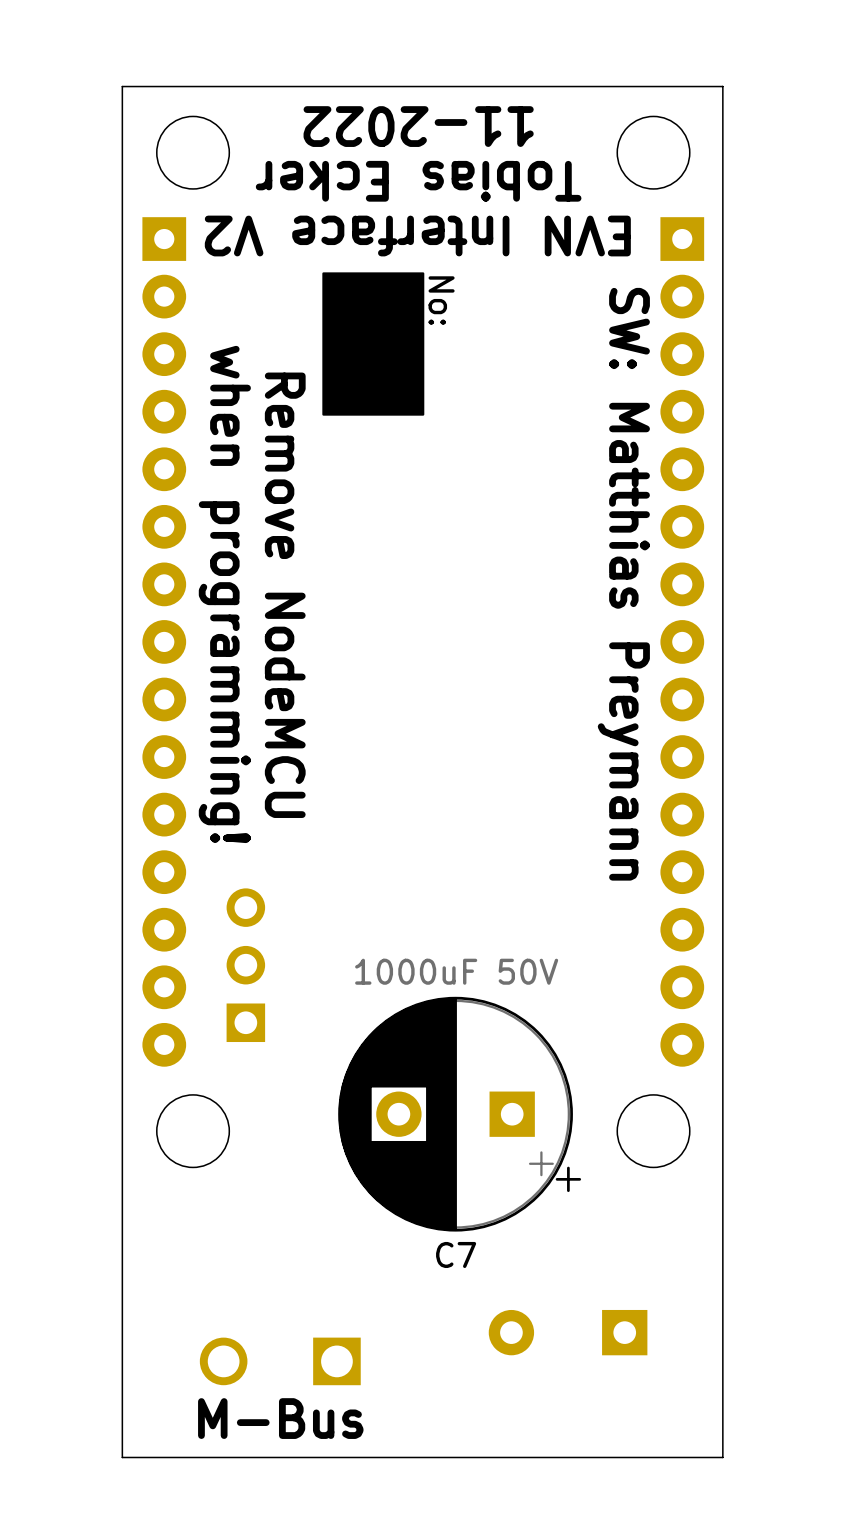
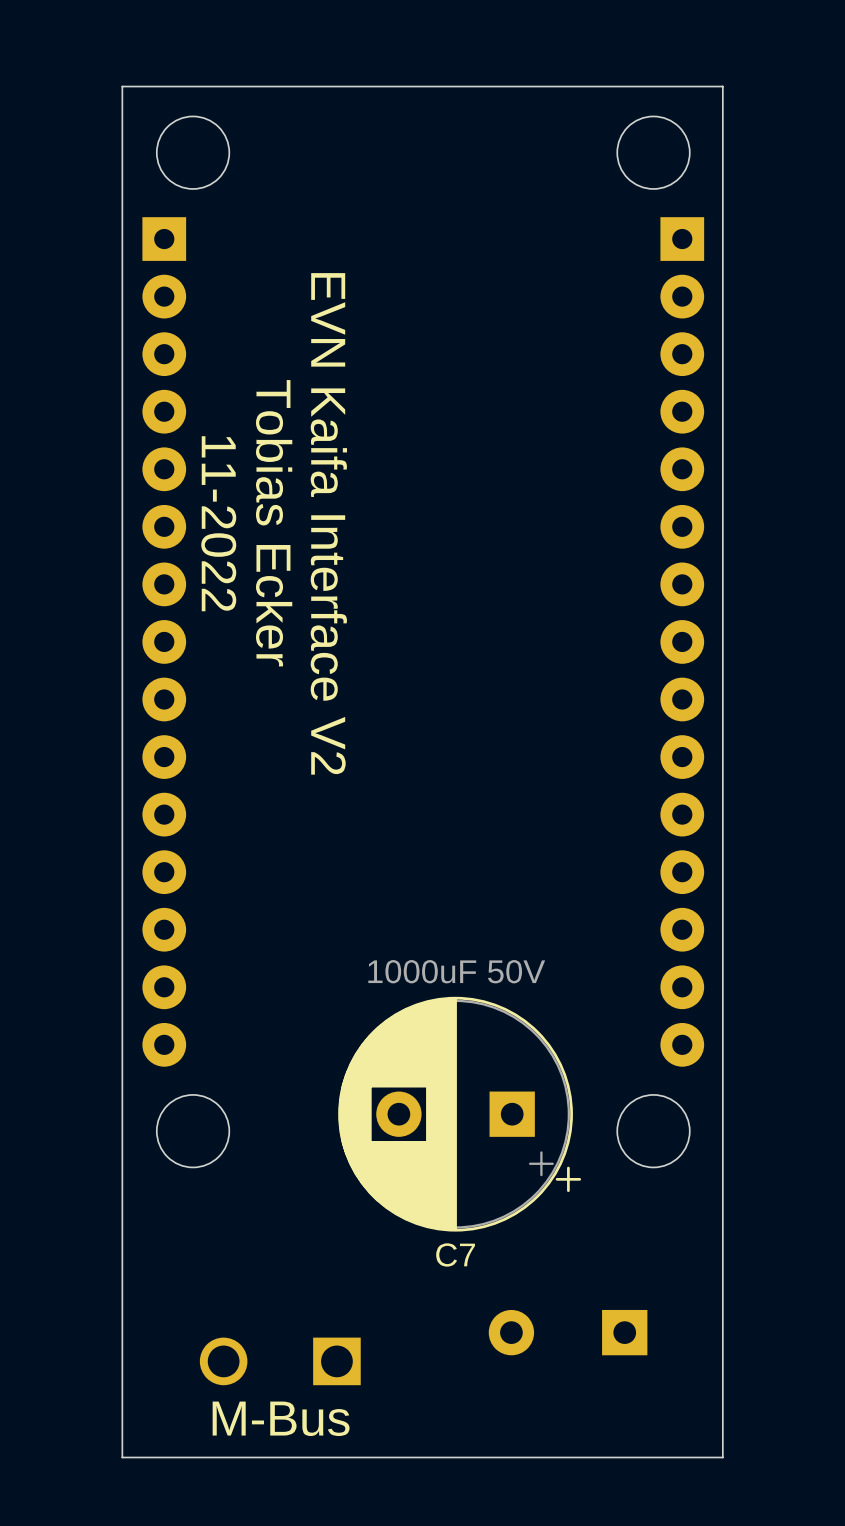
text rotation: 0° (418, 126) -> 90° counterclockwise (218, 523)
text position: 11-2022 (418, 126) -> 11-2022 (218, 523)
text rotation: 0° (418, 181) -> 90° counterclockwise (274, 523)
text: EVN Interface V2 (417, 236) -> EVN Kaifa Interface V2 (328, 523)
drawing: [322, 272, 425, 416] -> none
text: No: (441, 300) -> none
text: SW: Matthias Preymann (623, 584) -> none
text: when programming! (224, 594) -> none
text: Remove NodeMCU (285, 595) -> none
part: (245, 965) -> none

